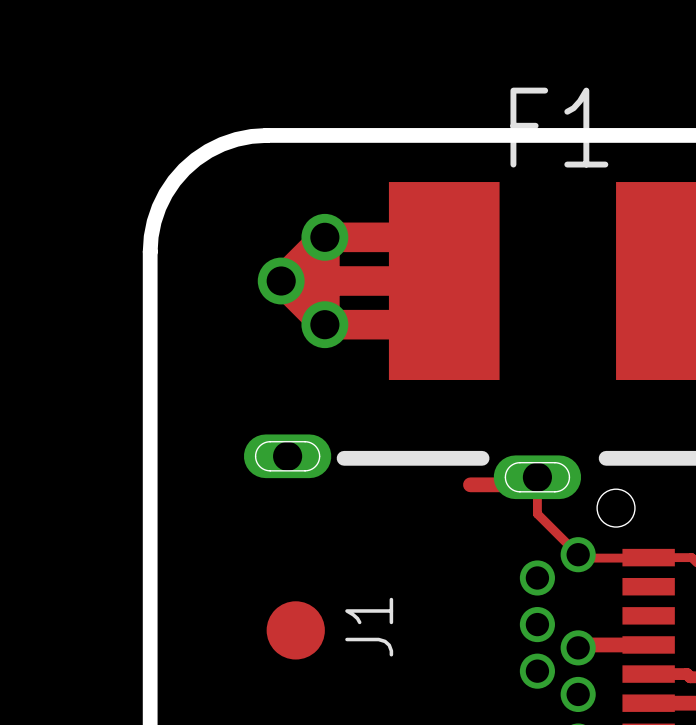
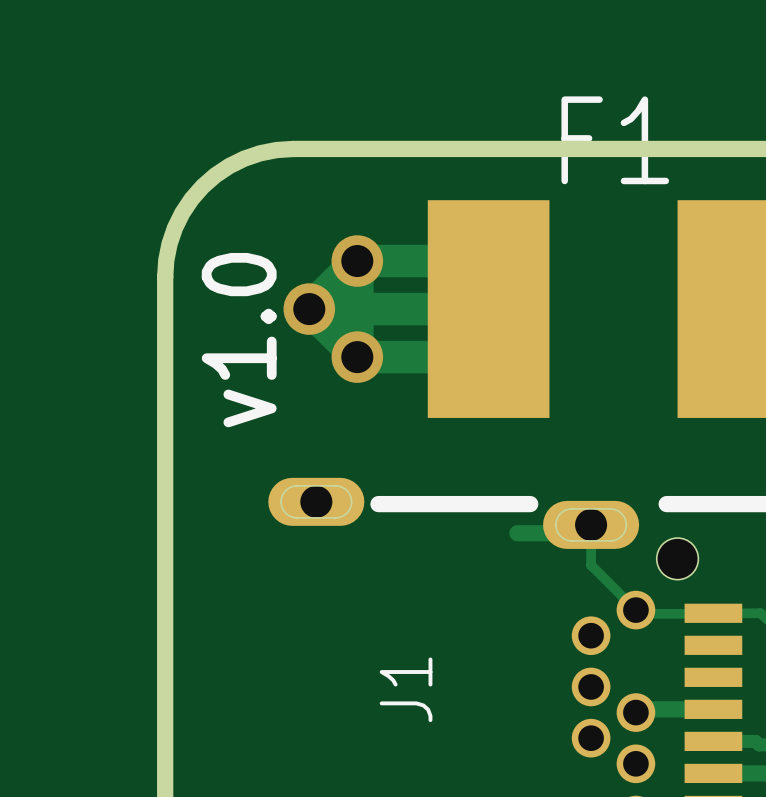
text: none -> v1.0 (239, 340)
part: (295, 630) -> none

